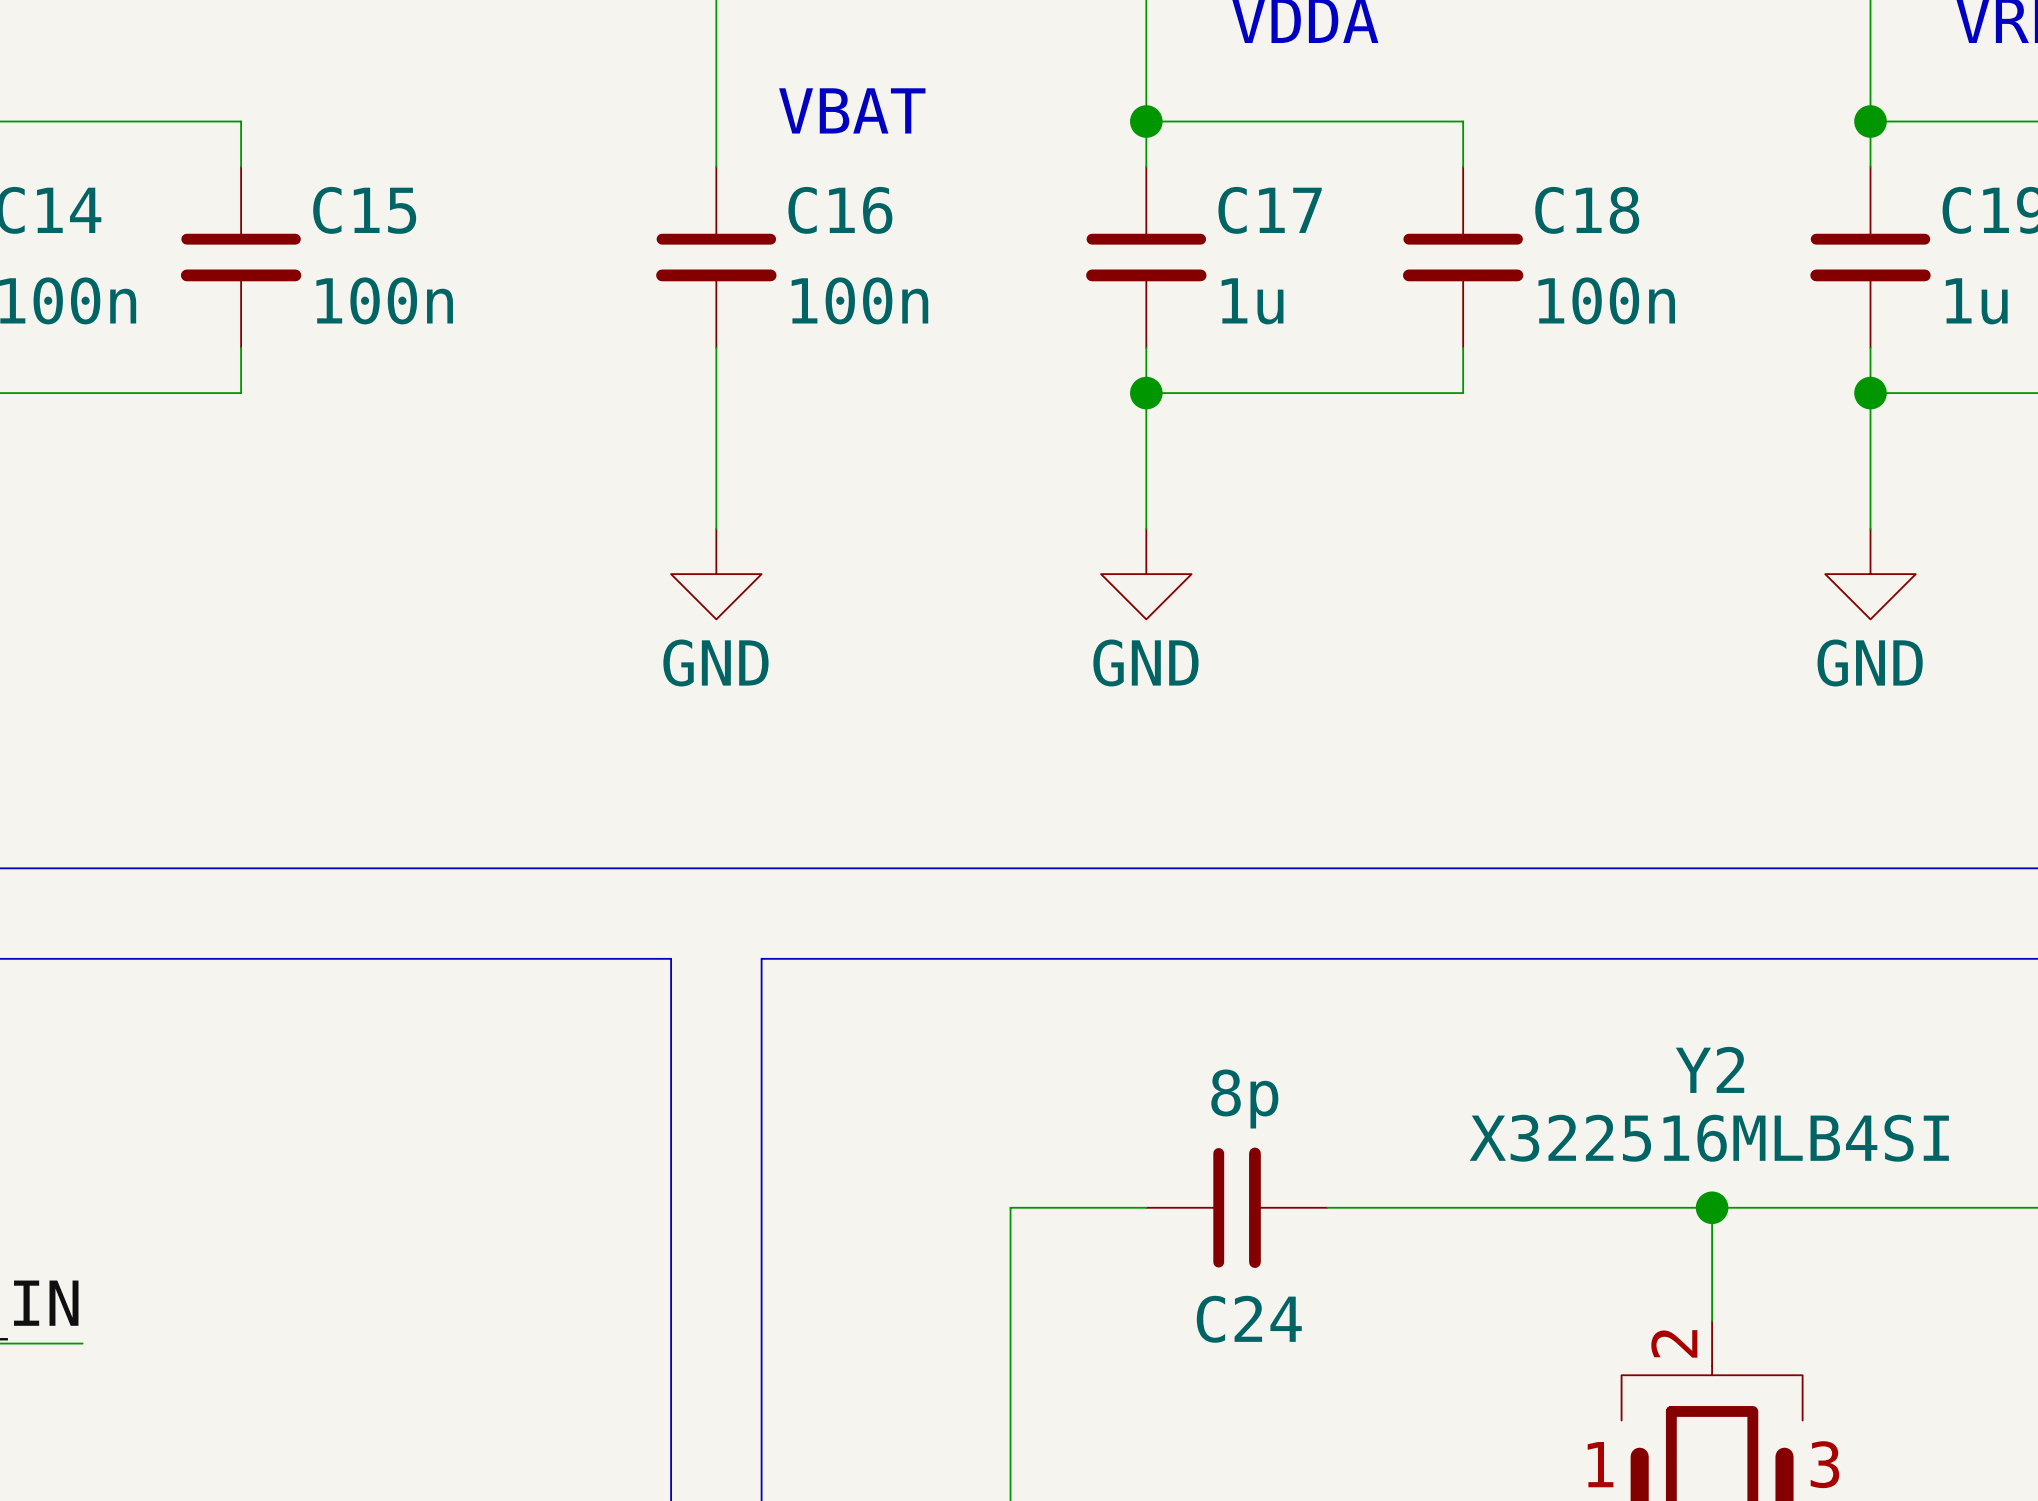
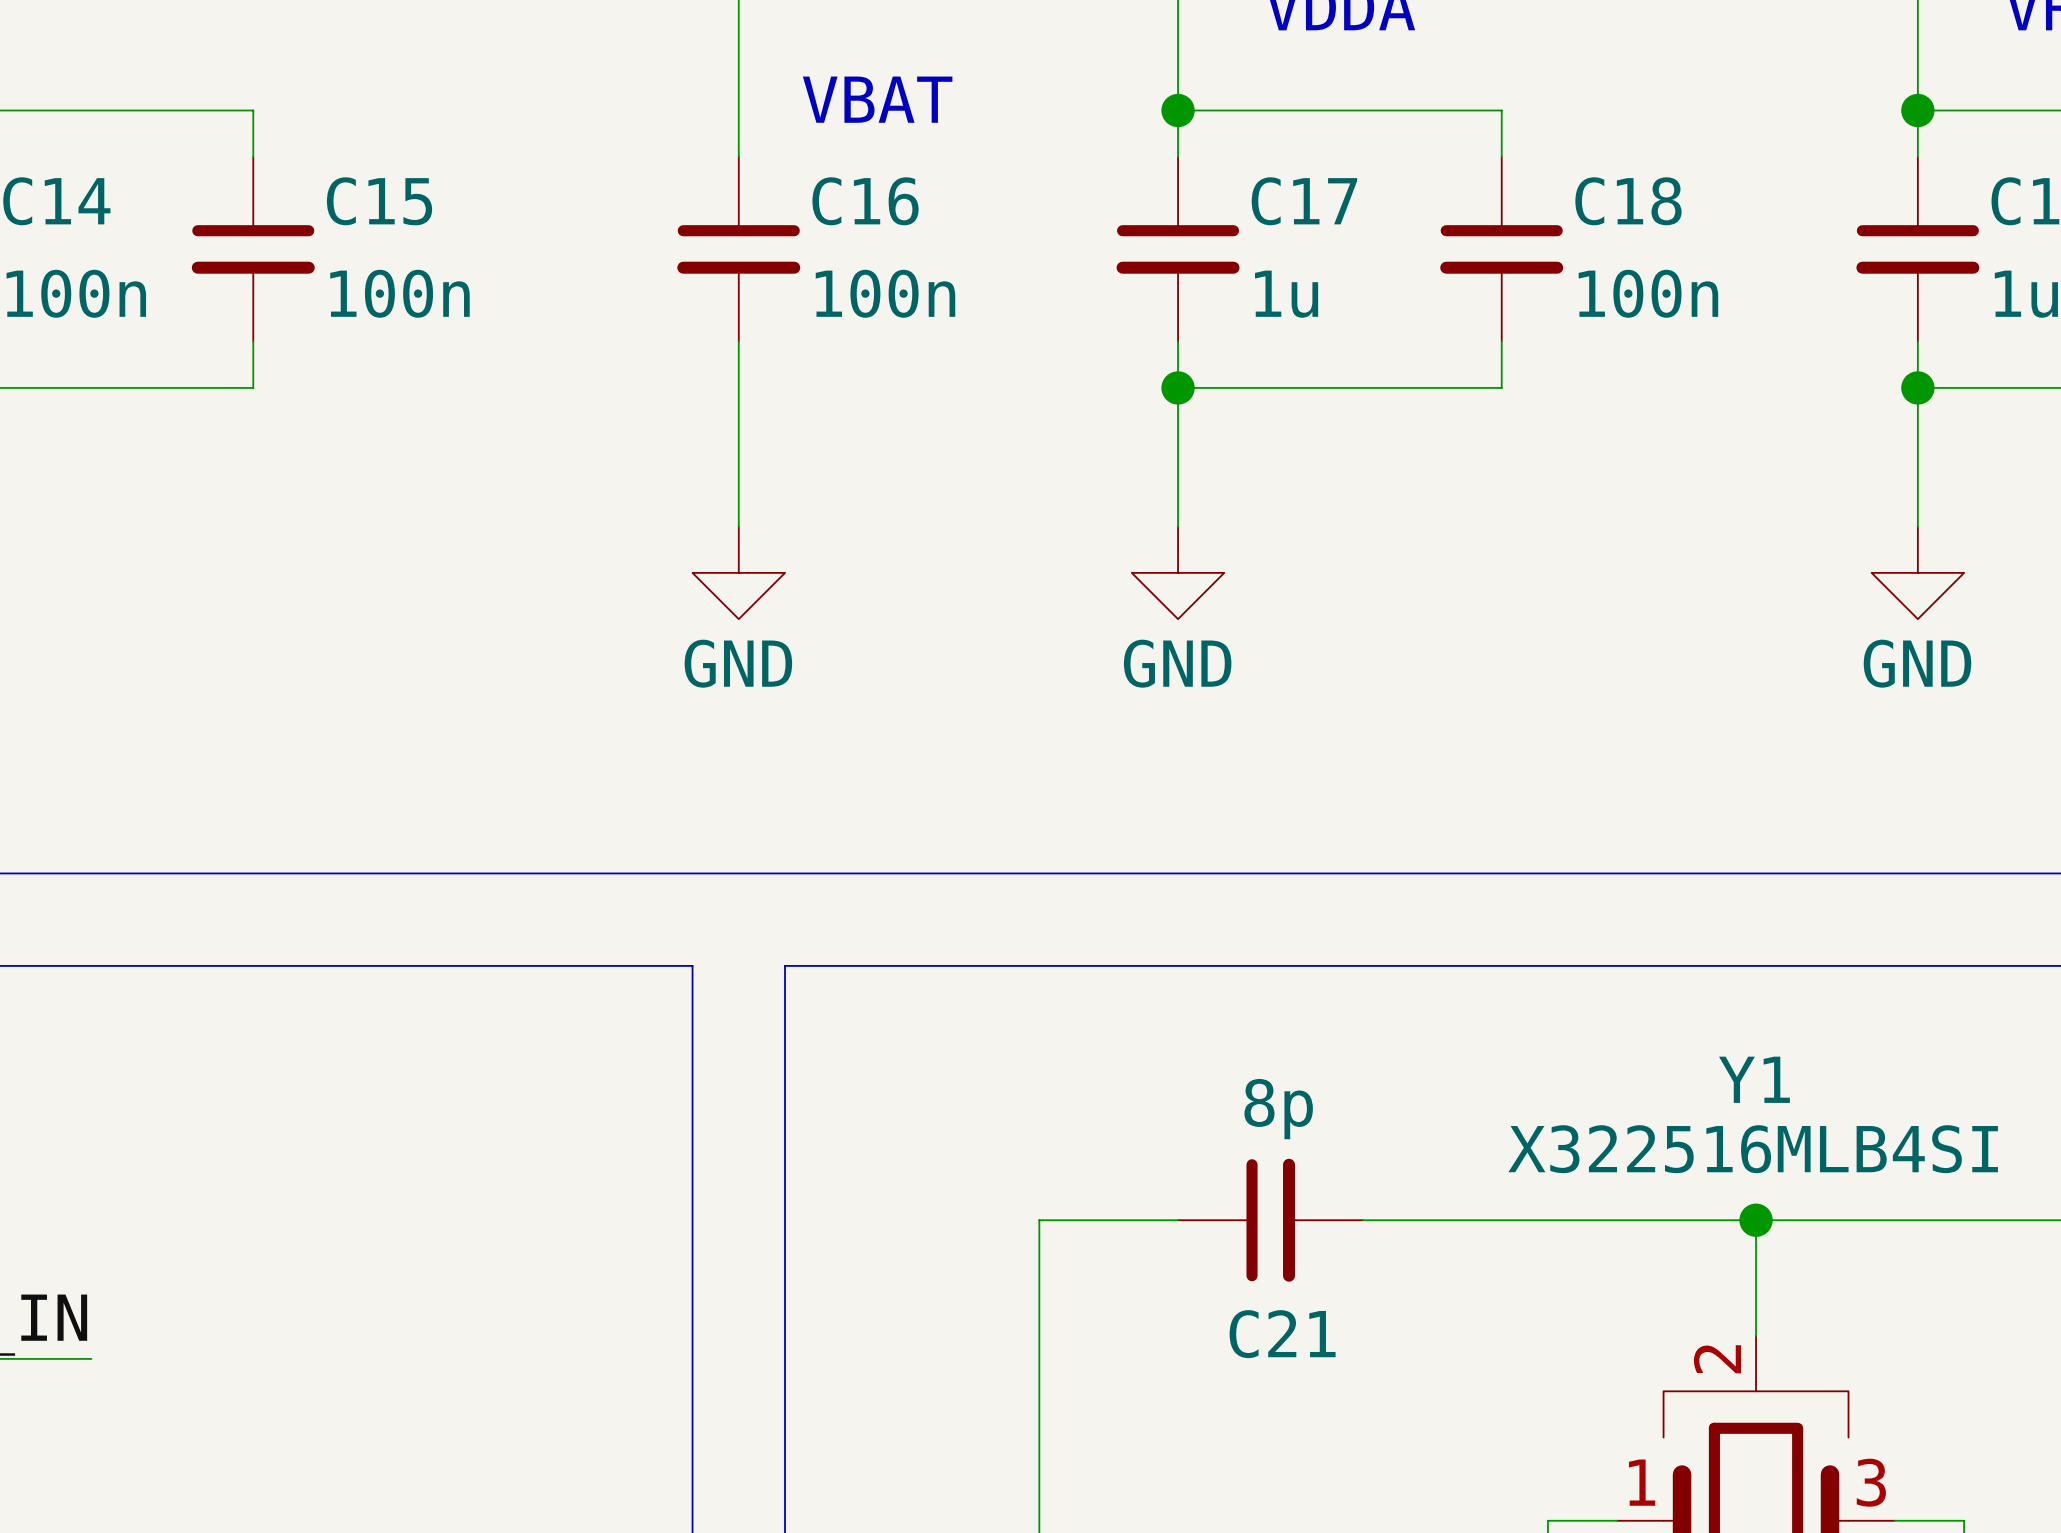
Y2 name: Y2 (1710, 1069) -> Y1 (1754, 1079)
C24 name: C24 (1249, 1319) -> C21 (1282, 1334)

